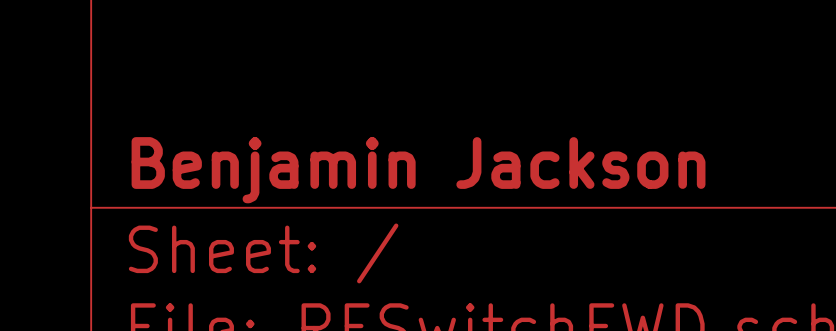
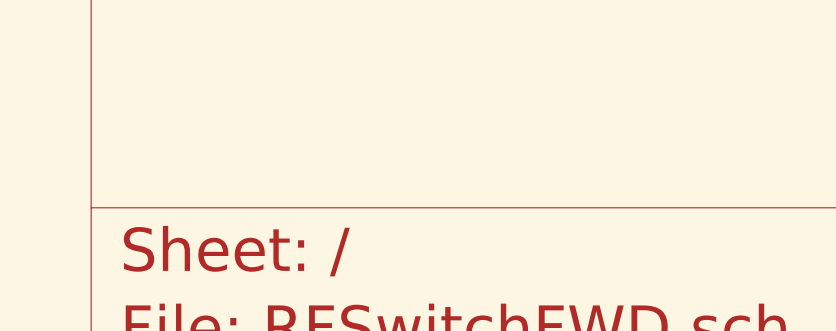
title block: Benjamin Jackson (418, 170) -> none

